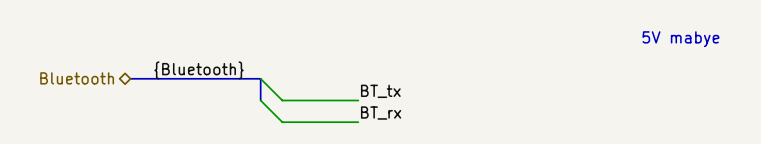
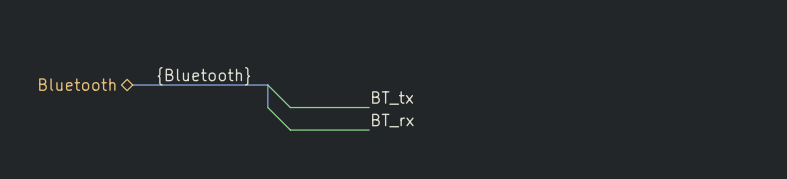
text: 5V mabye (680, 39) -> none

